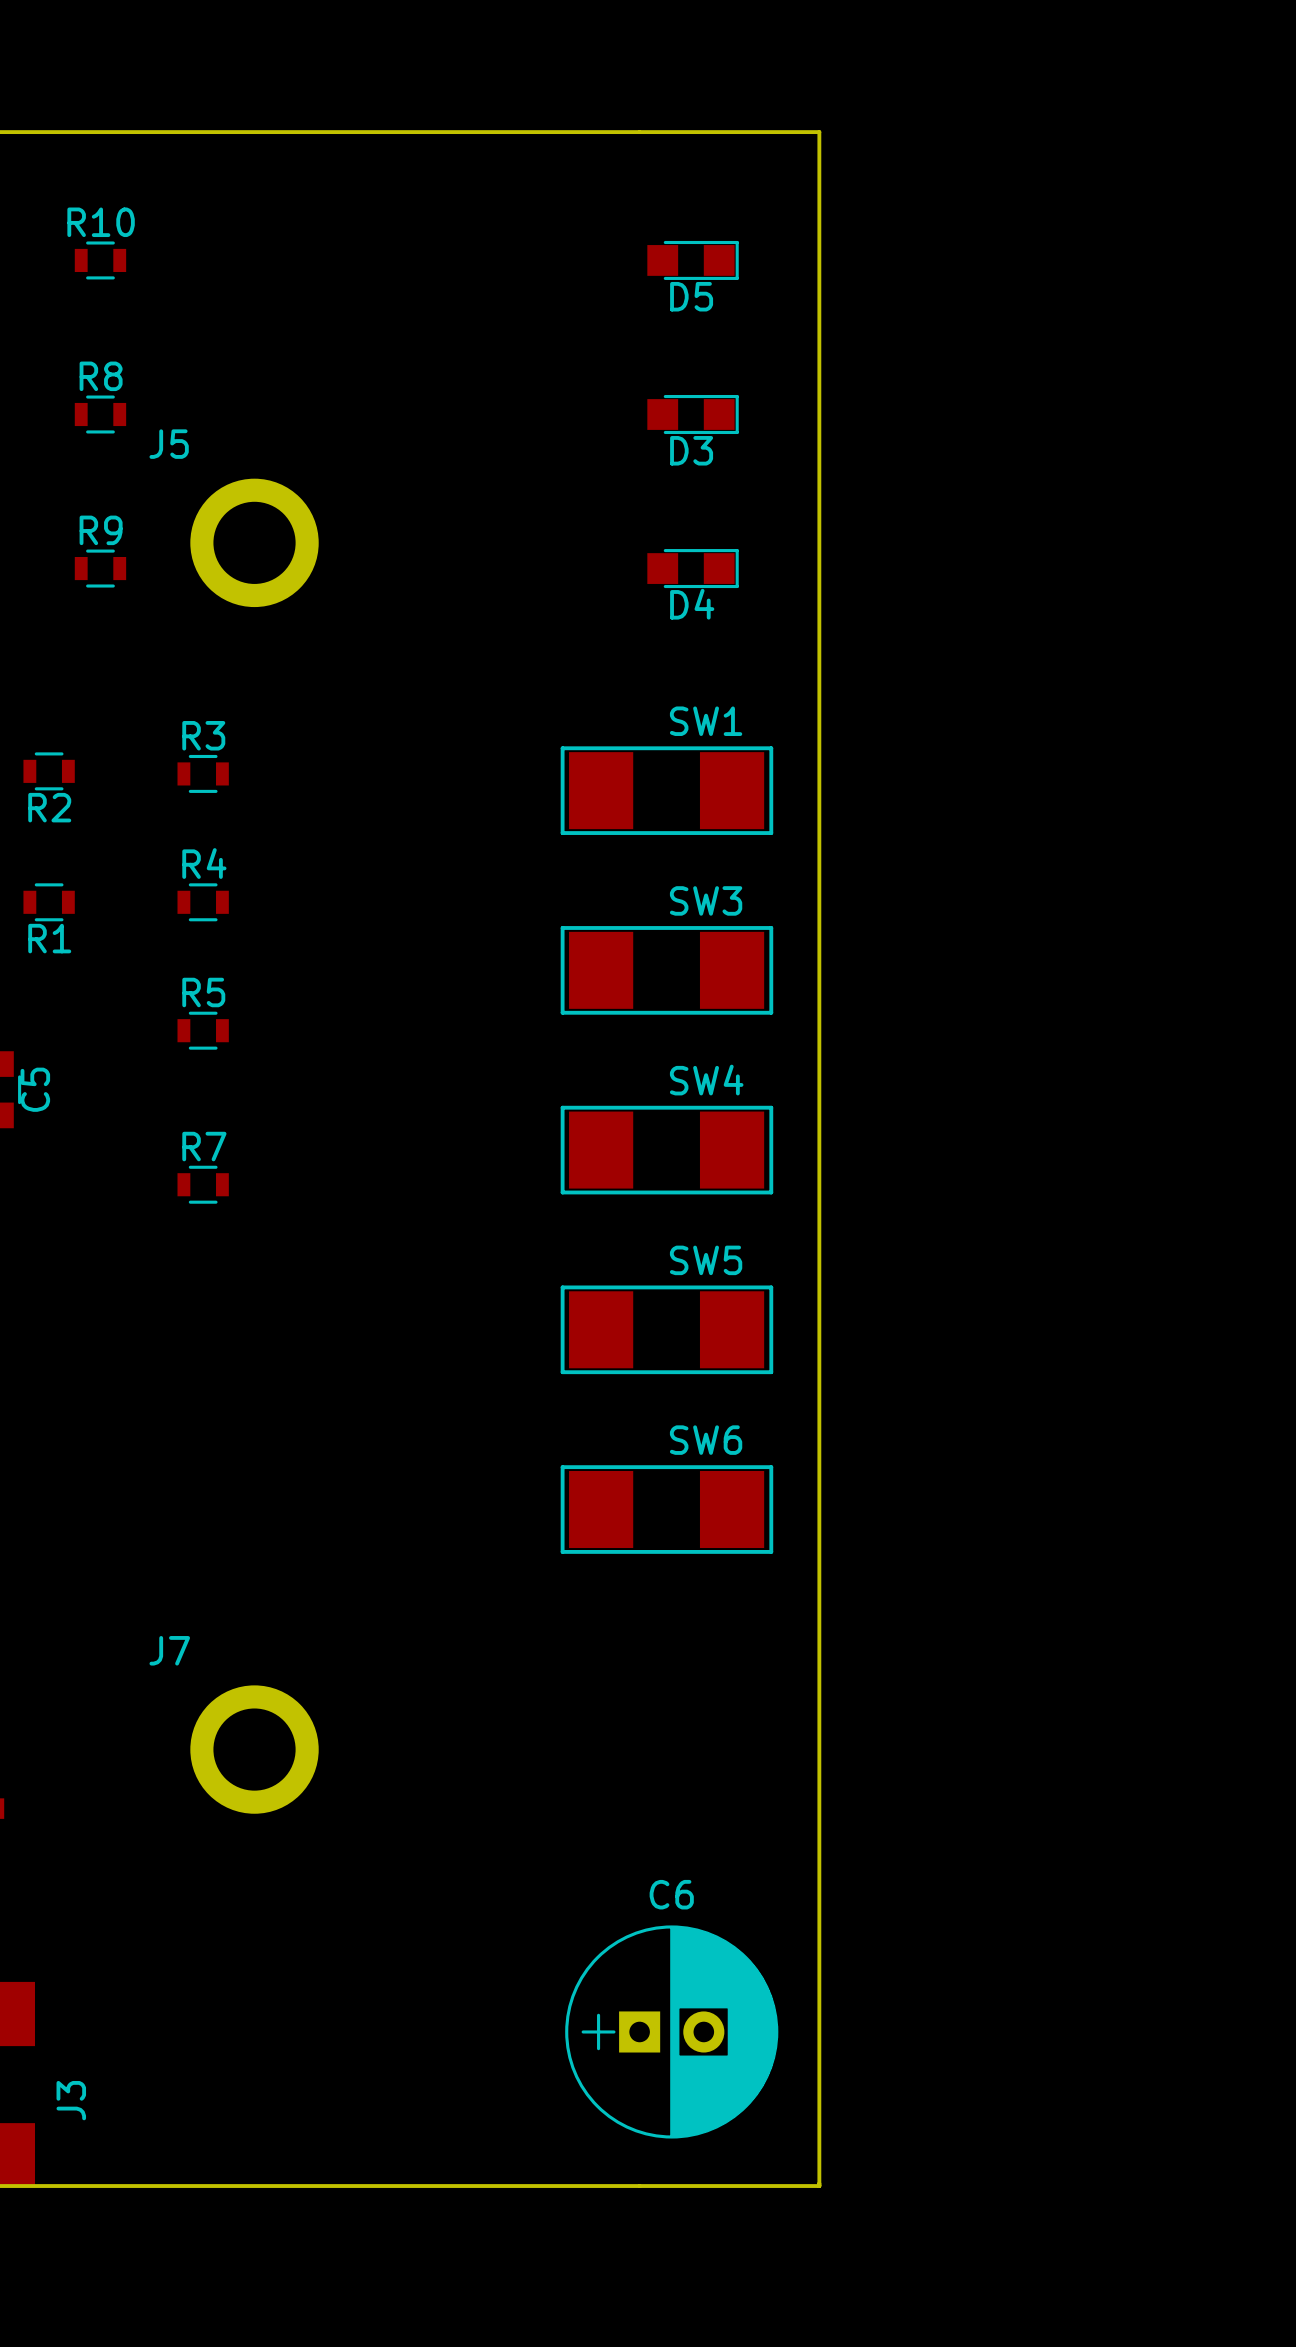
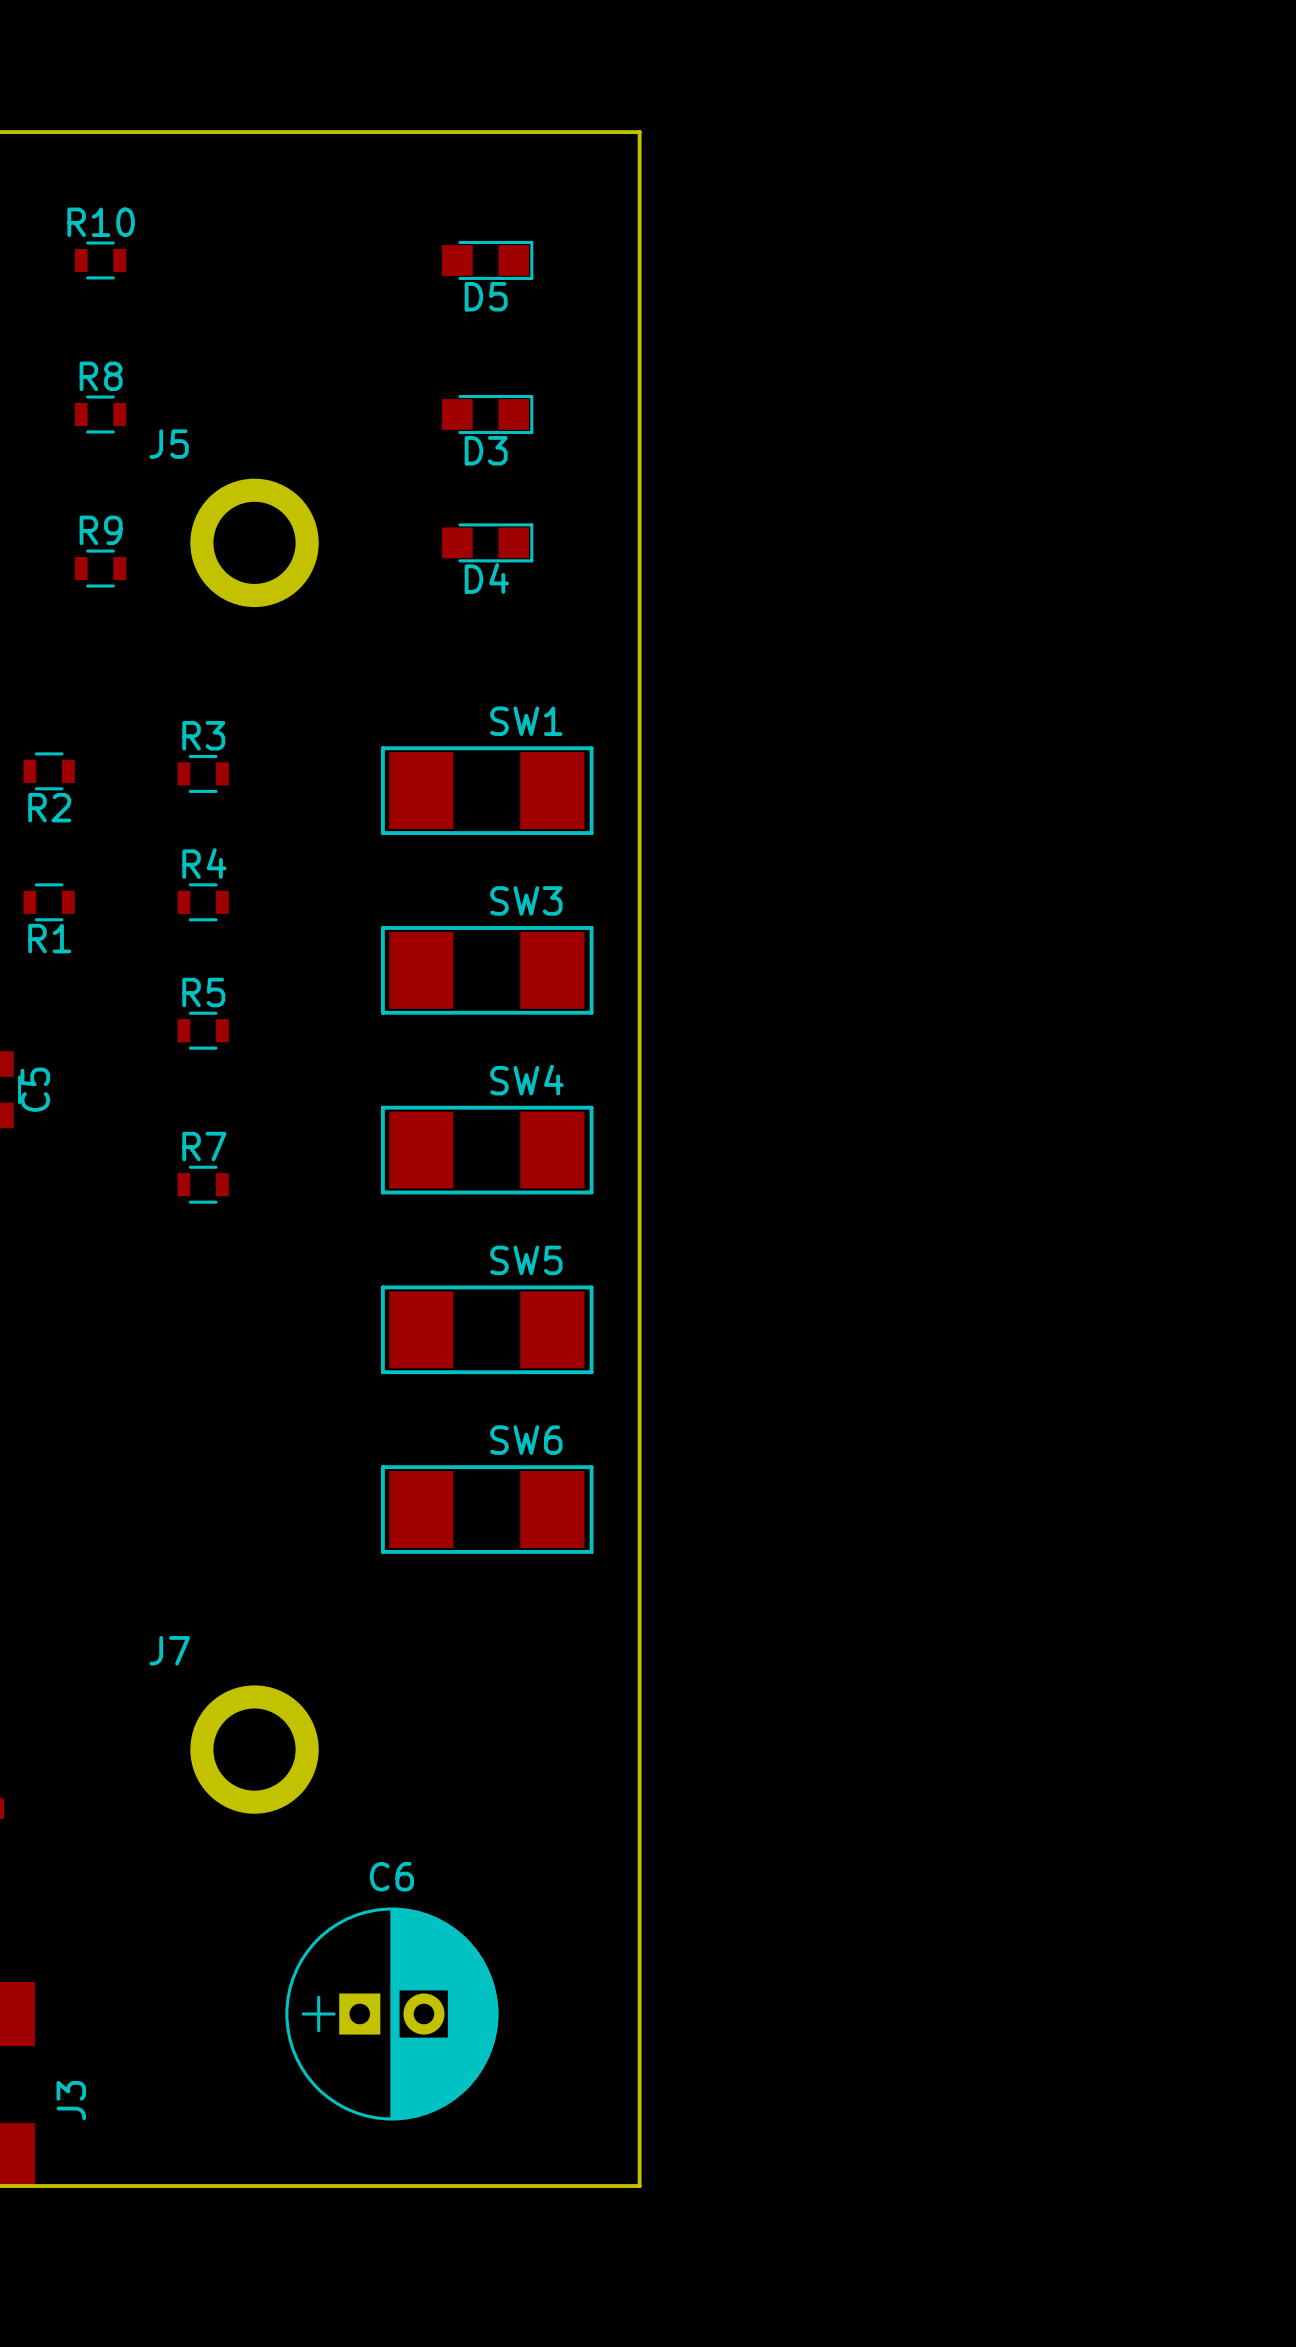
board edge: (639, 132) (819, 132) (819, 2186) (639, 2186) -> (639, 132) (639, 2186)
D5 position: (693, 260) -> (487, 260)
D3 position: (693, 414) -> (487, 414)
D4 position: (693, 568) -> (487, 542)
SW1 position: (666, 790) -> (487, 790)
SW3 position: (666, 970) -> (487, 970)
SW4 position: (666, 1150) -> (487, 1150)
SW5 position: (666, 1329) -> (487, 1329)
SW6 position: (666, 1509) -> (487, 1509)
C6 position: (671, 2031) -> (391, 2014)

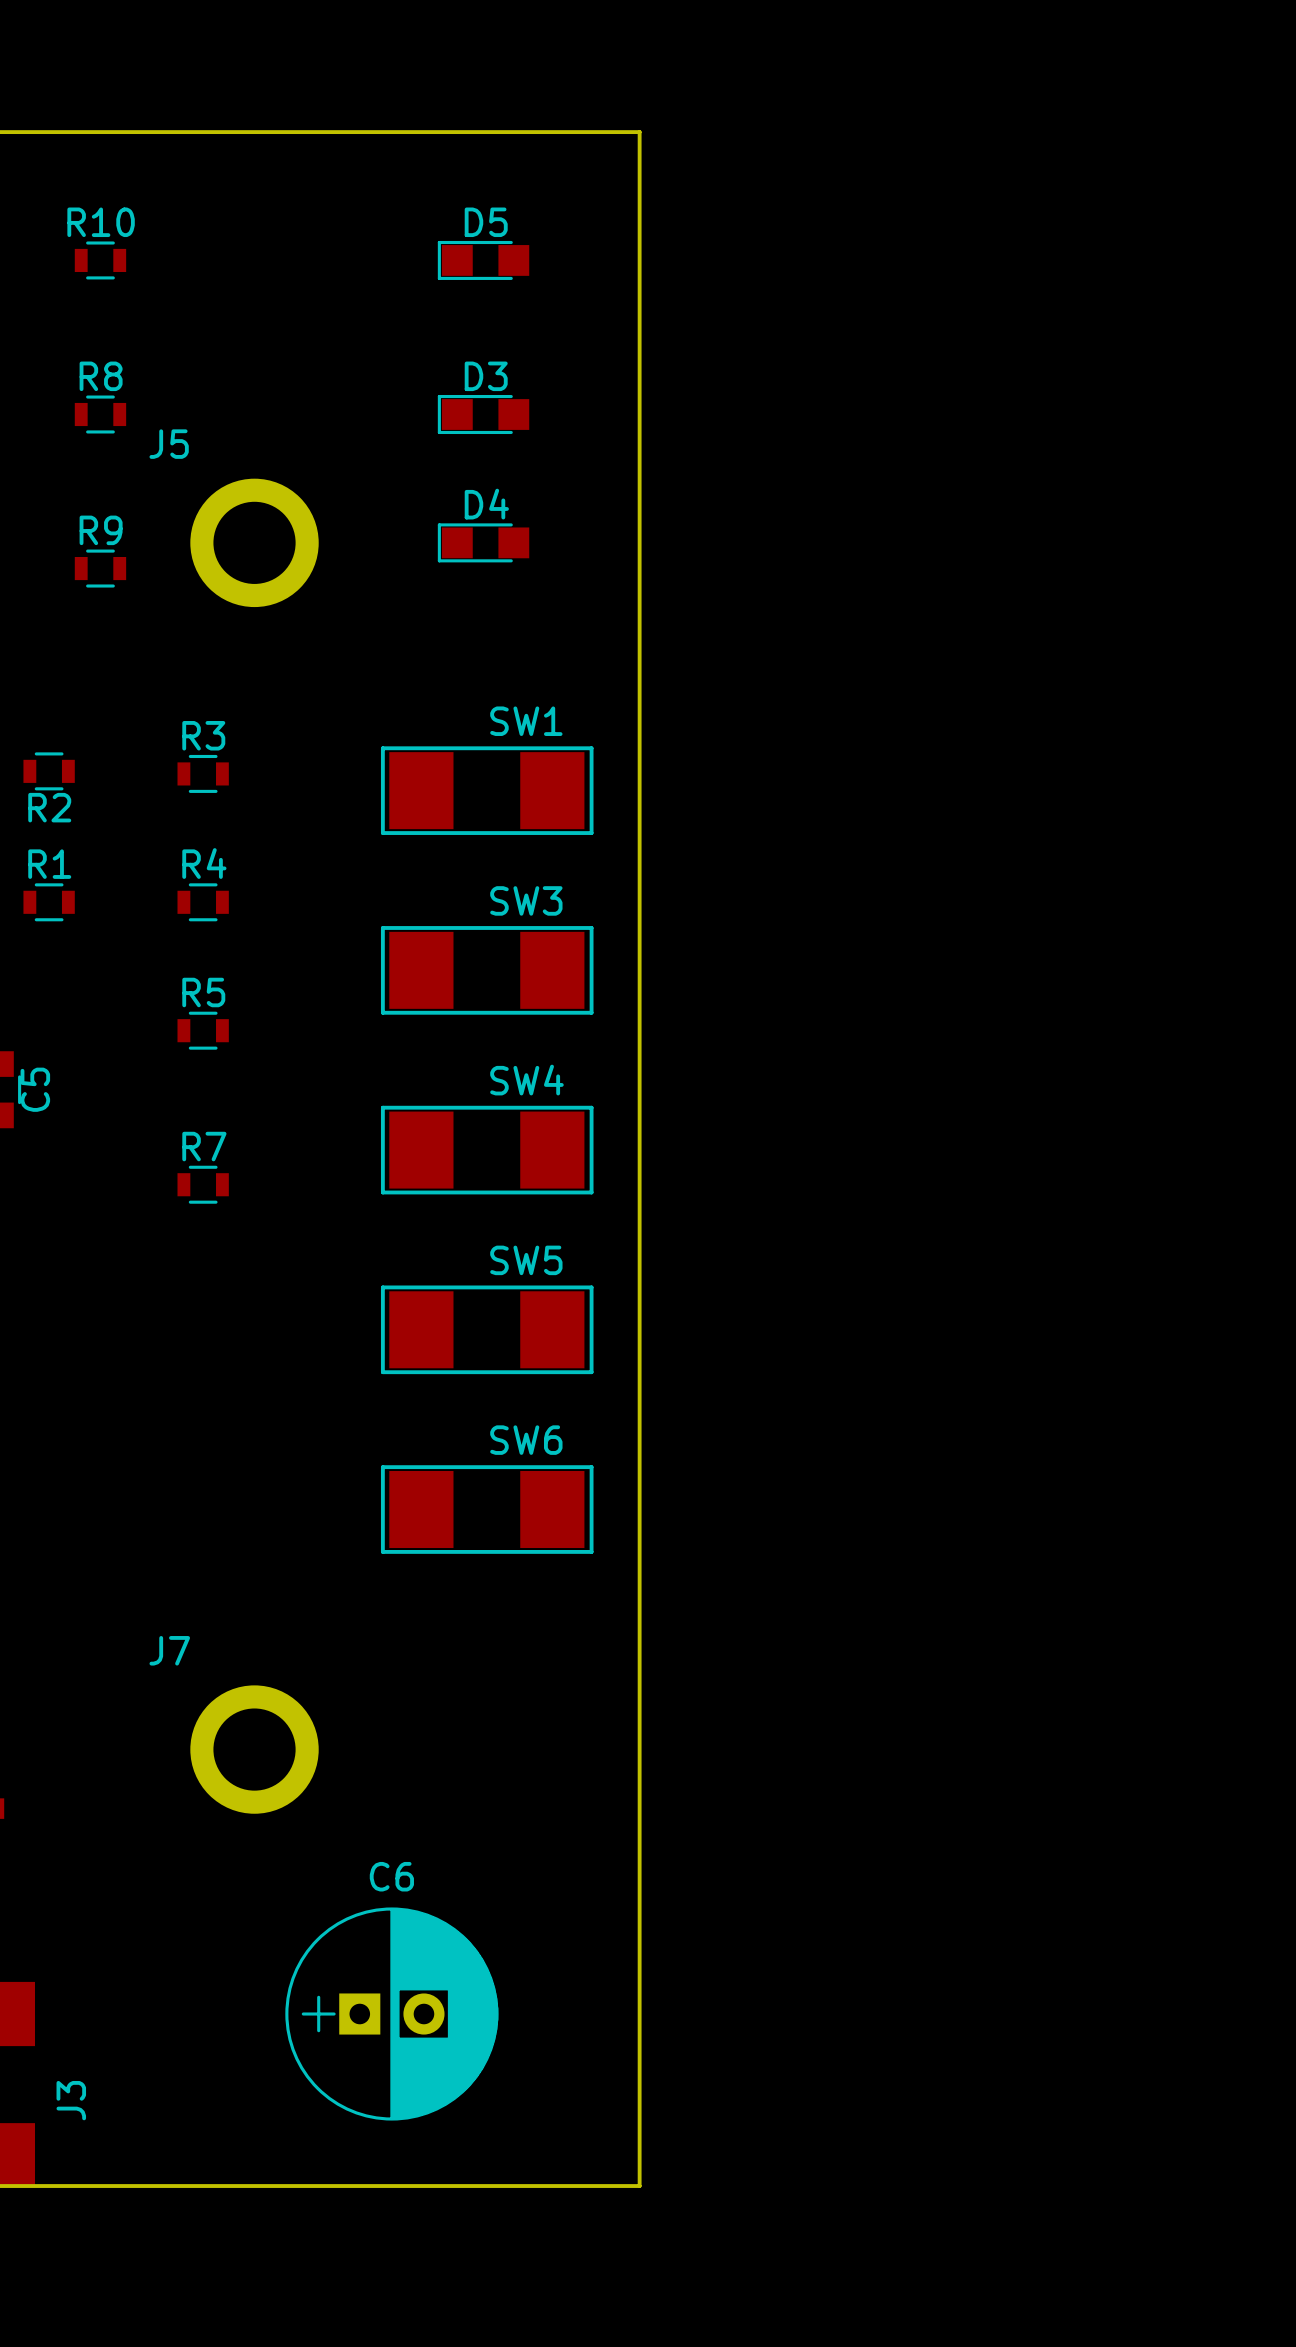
D5 rotation: 0° (487, 260) -> 180° (483, 260)
D3 rotation: 0° (487, 414) -> 180° (483, 414)
D4 rotation: 0° (487, 542) -> 180° (483, 542)
R1 name position: R1 (49, 938) -> R1 (49, 864)

